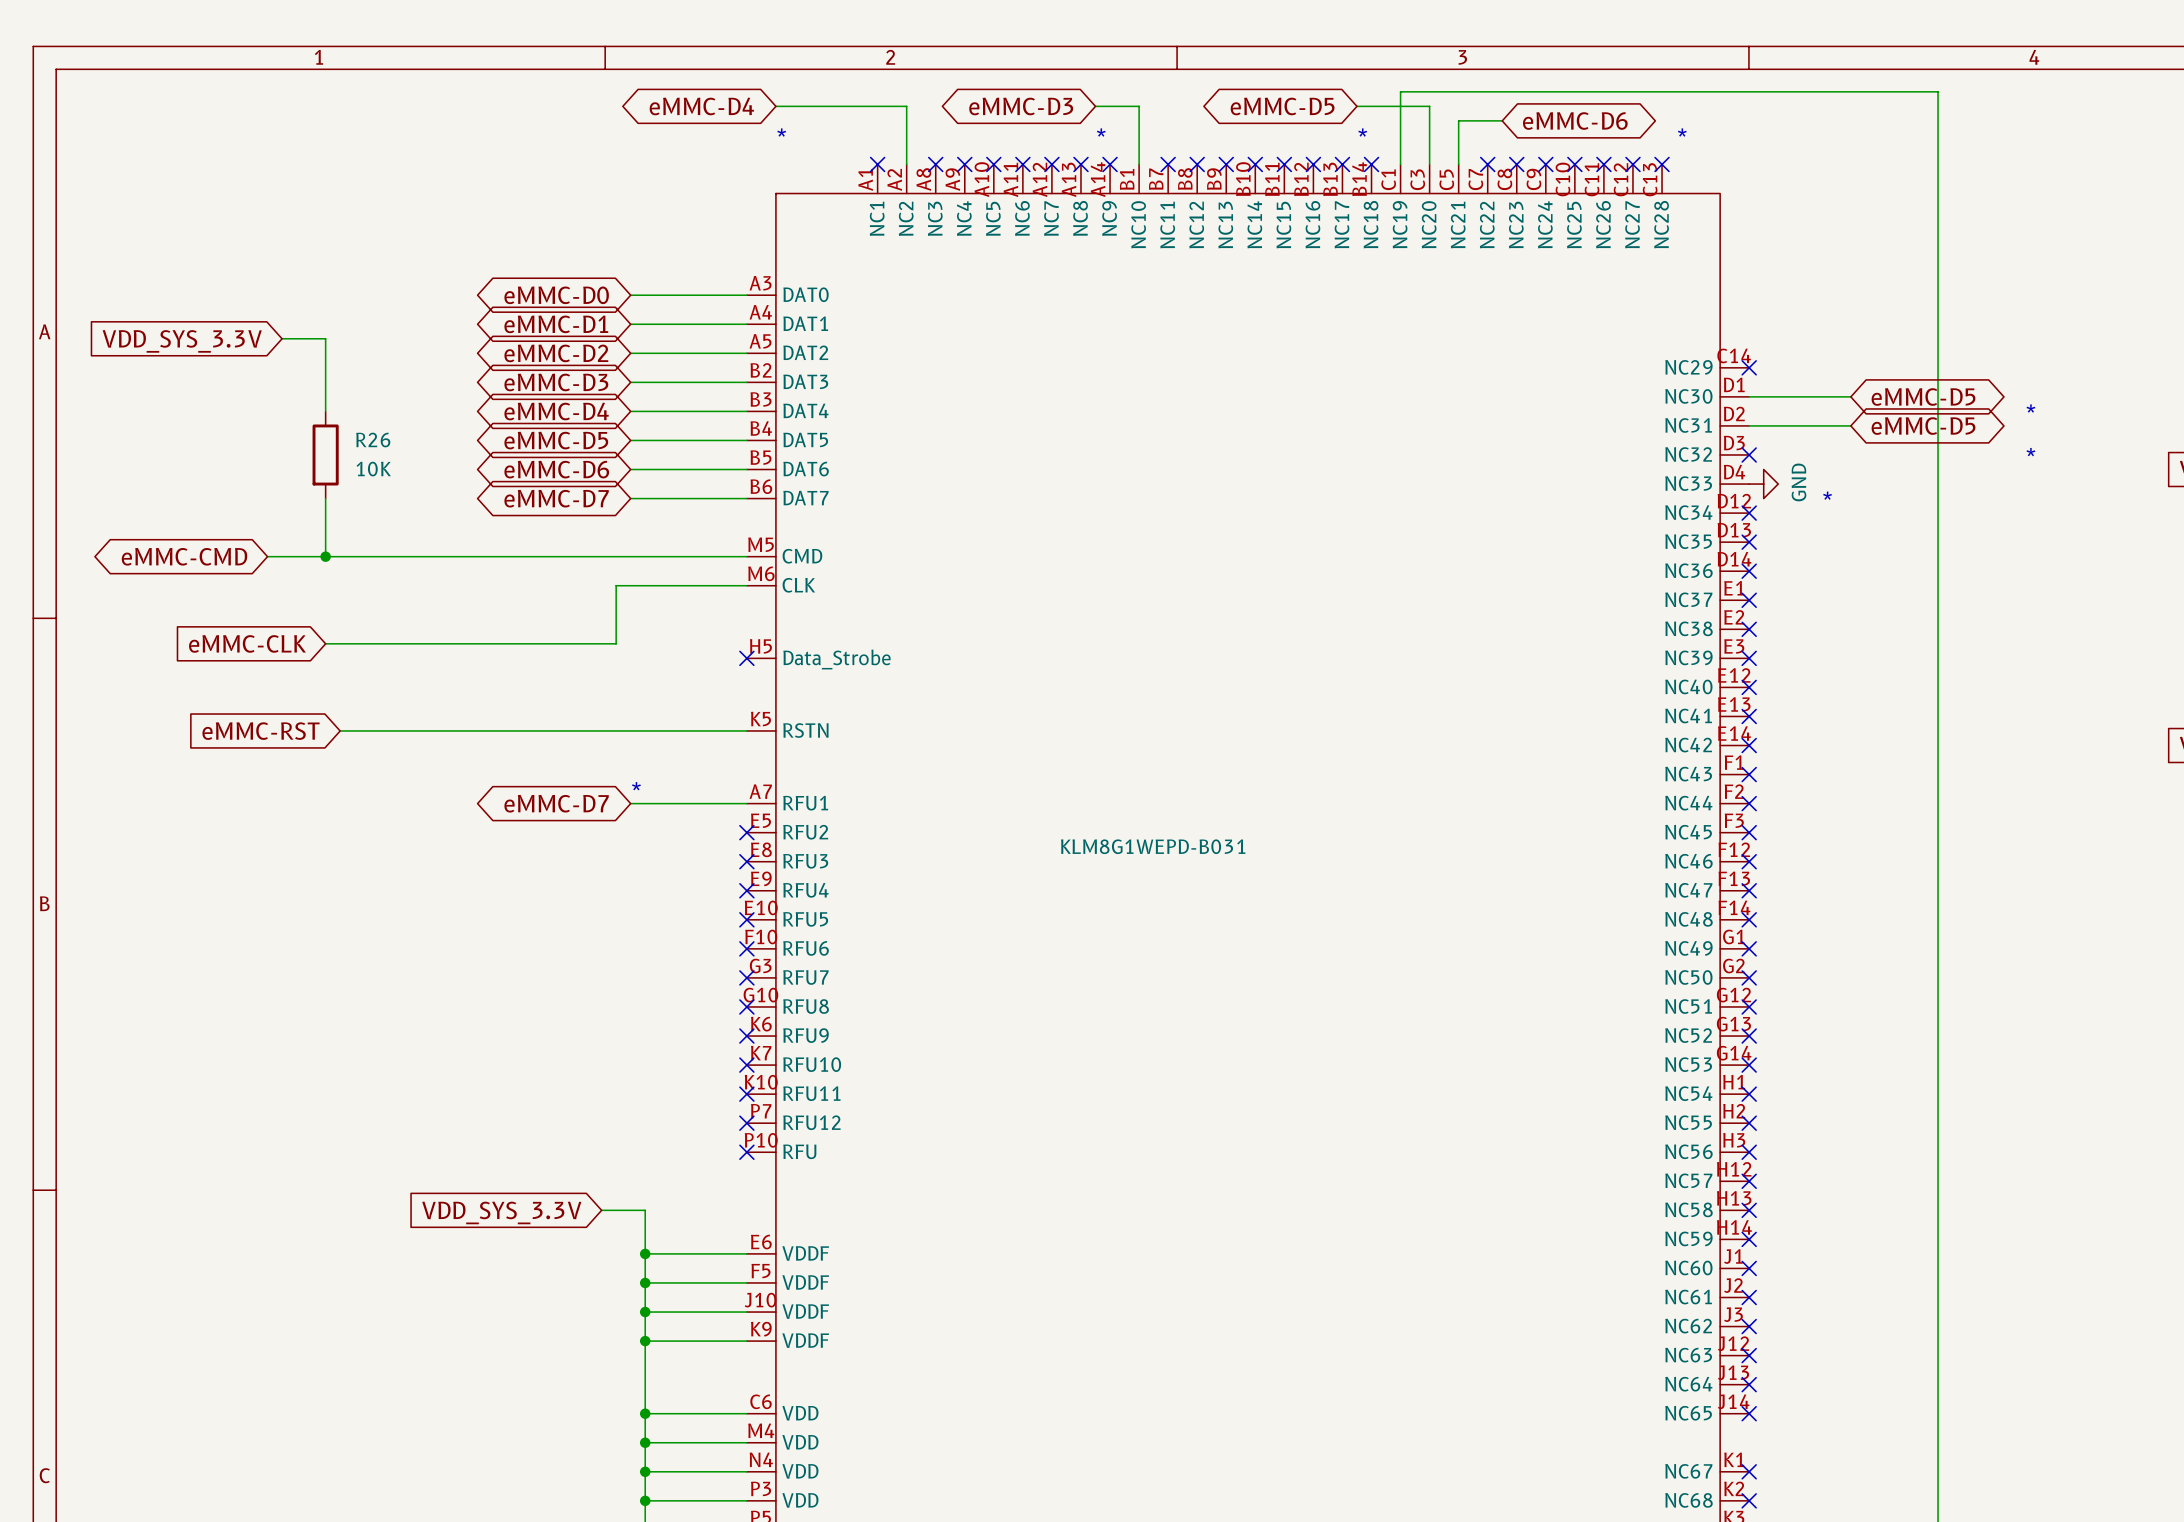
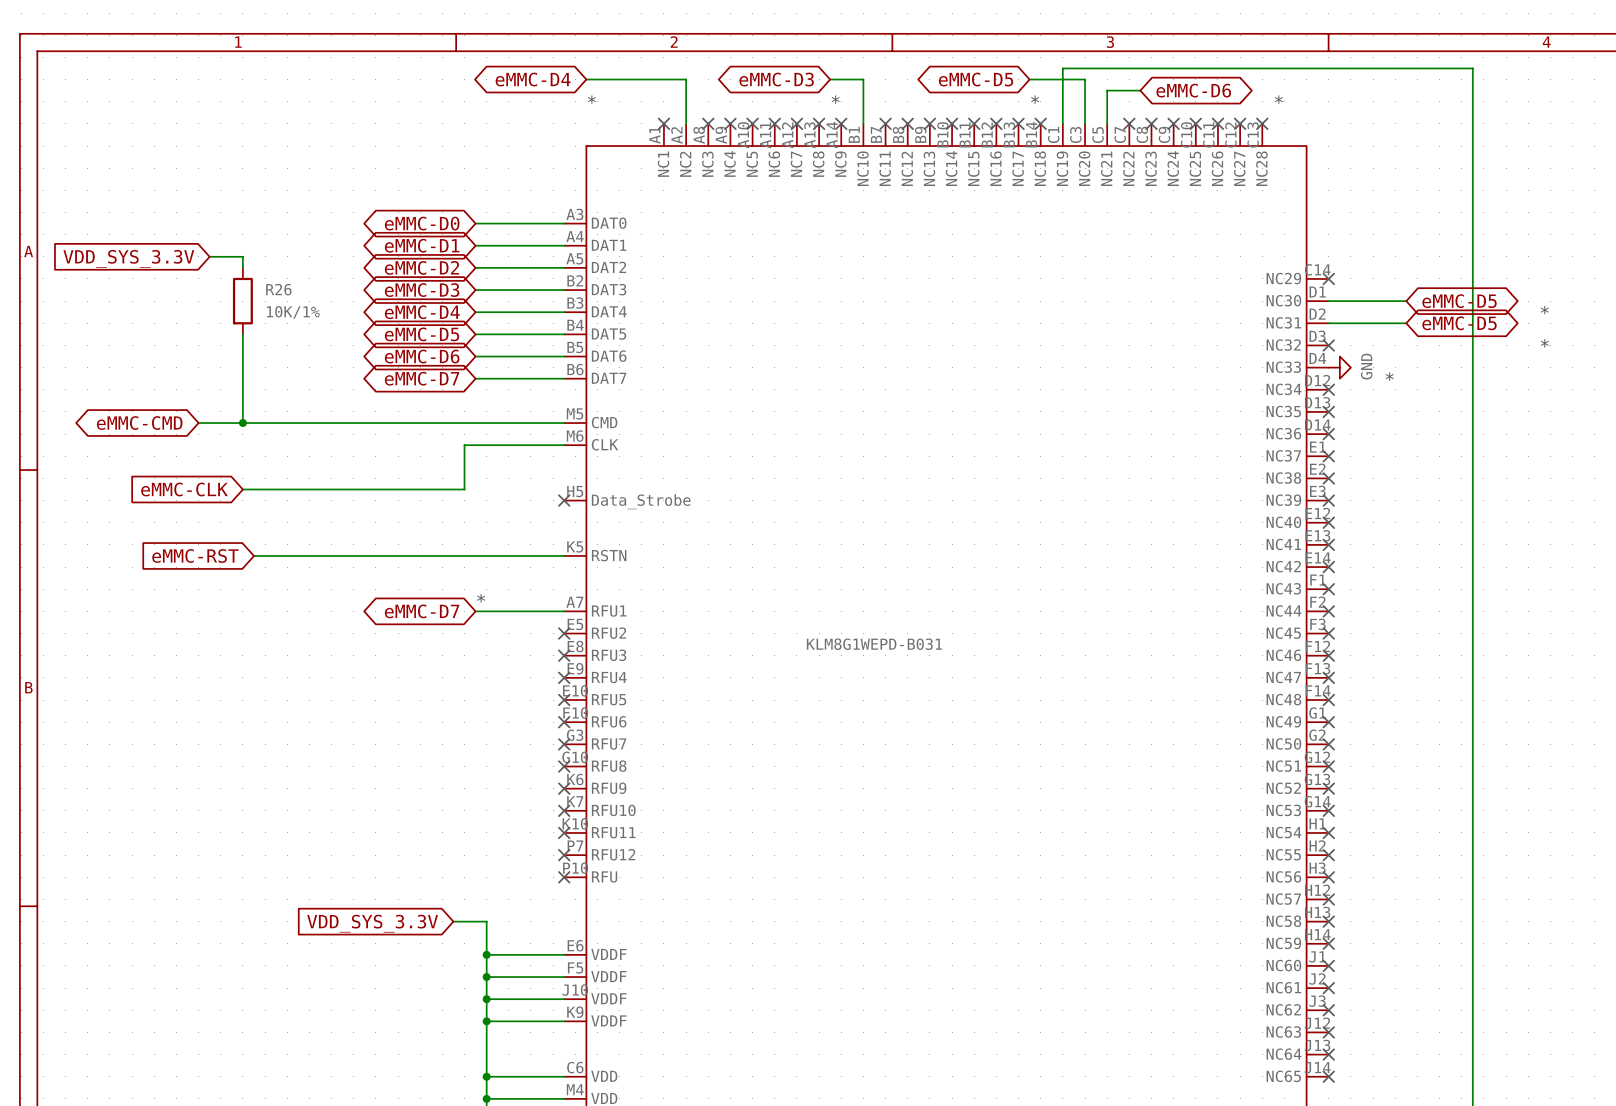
wire: (325, 353) (325, 411) -> (242, 334) (242, 378)
R26 position: (325, 454) -> (242, 301)
R26 value: 10K (373, 469) -> 10K/1% (293, 312)

